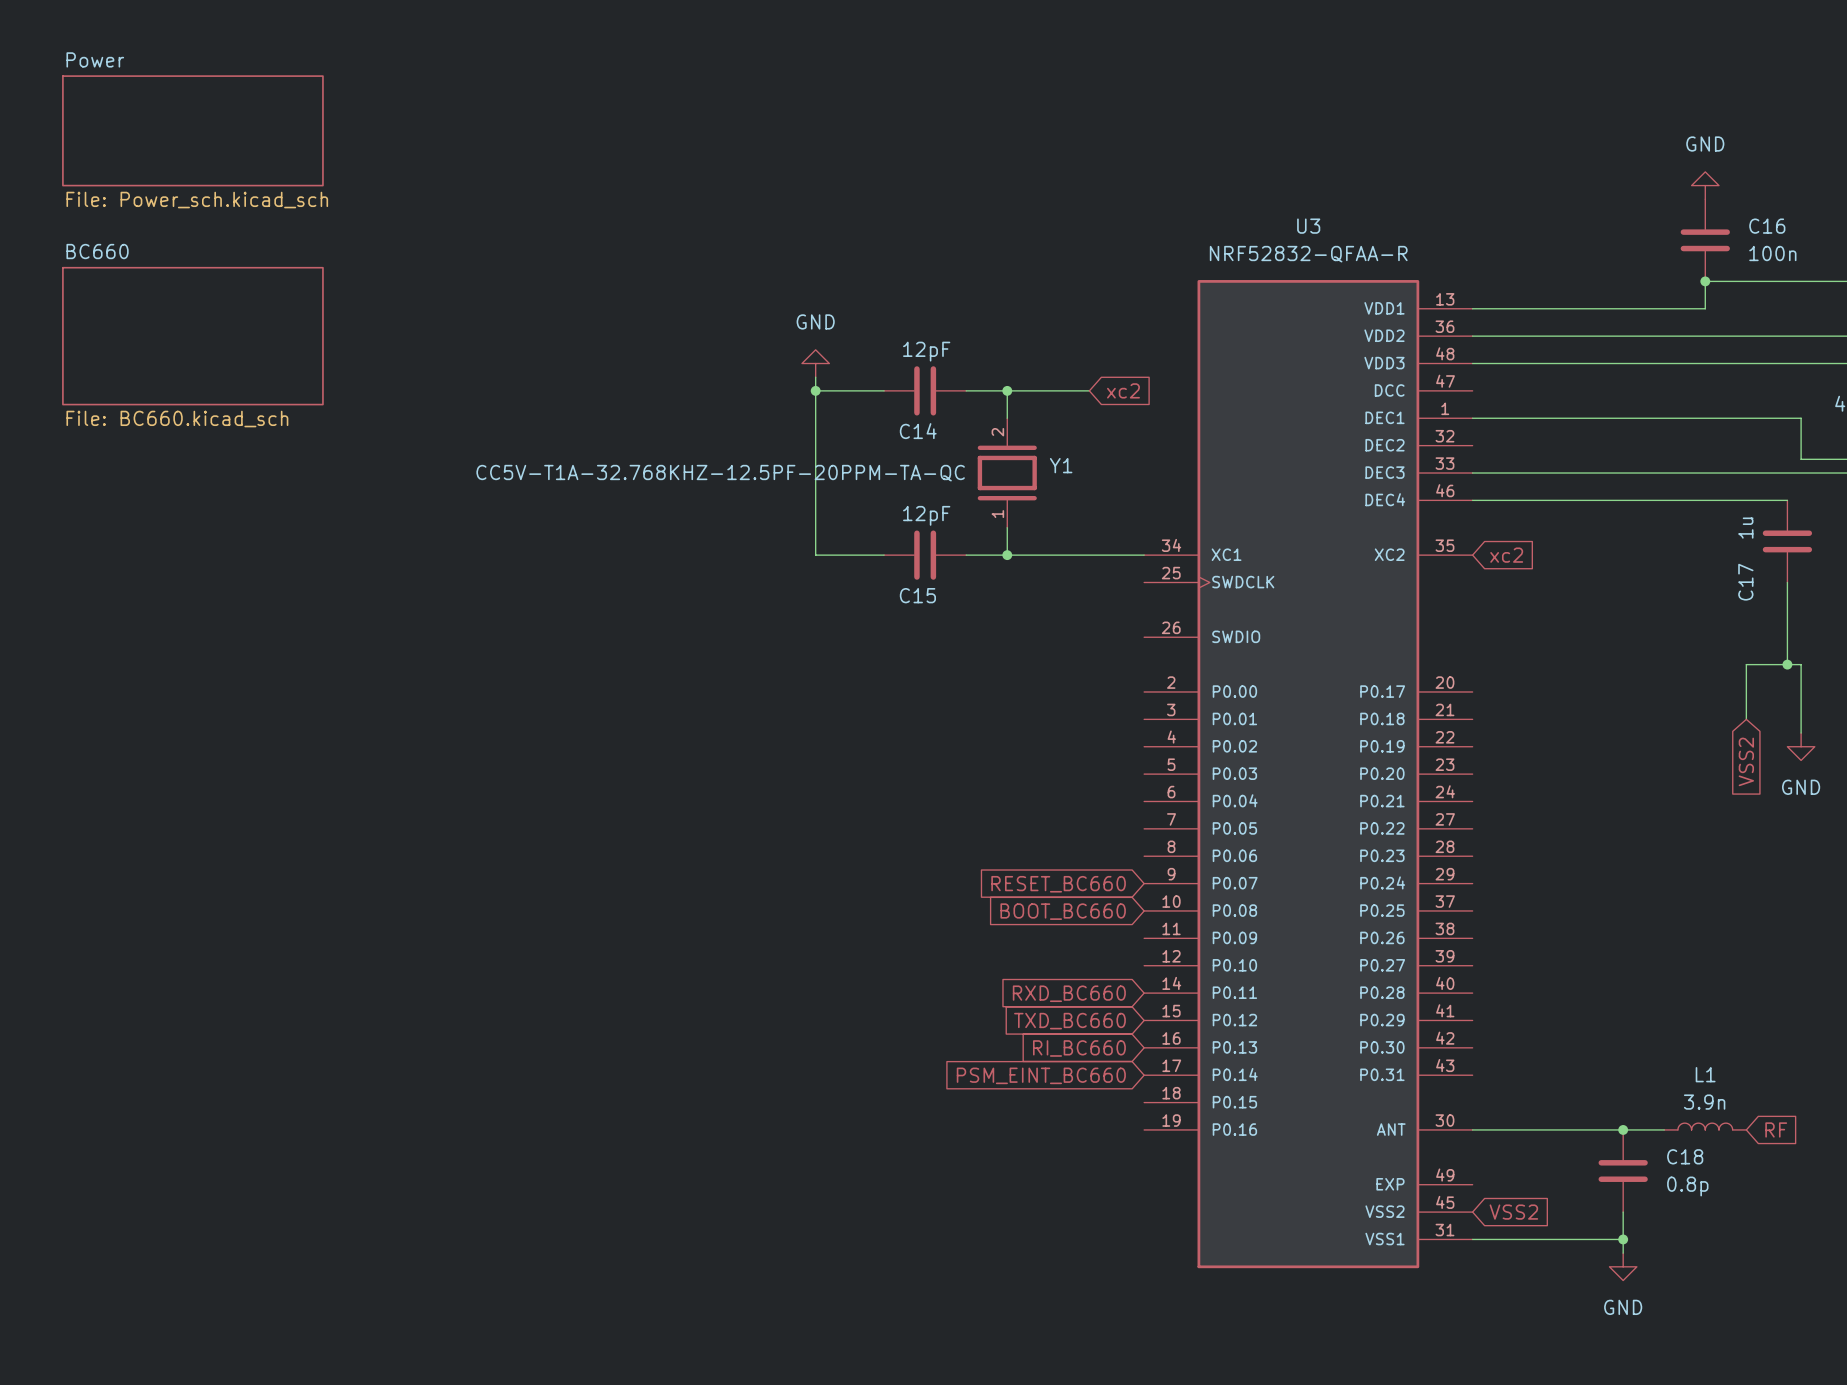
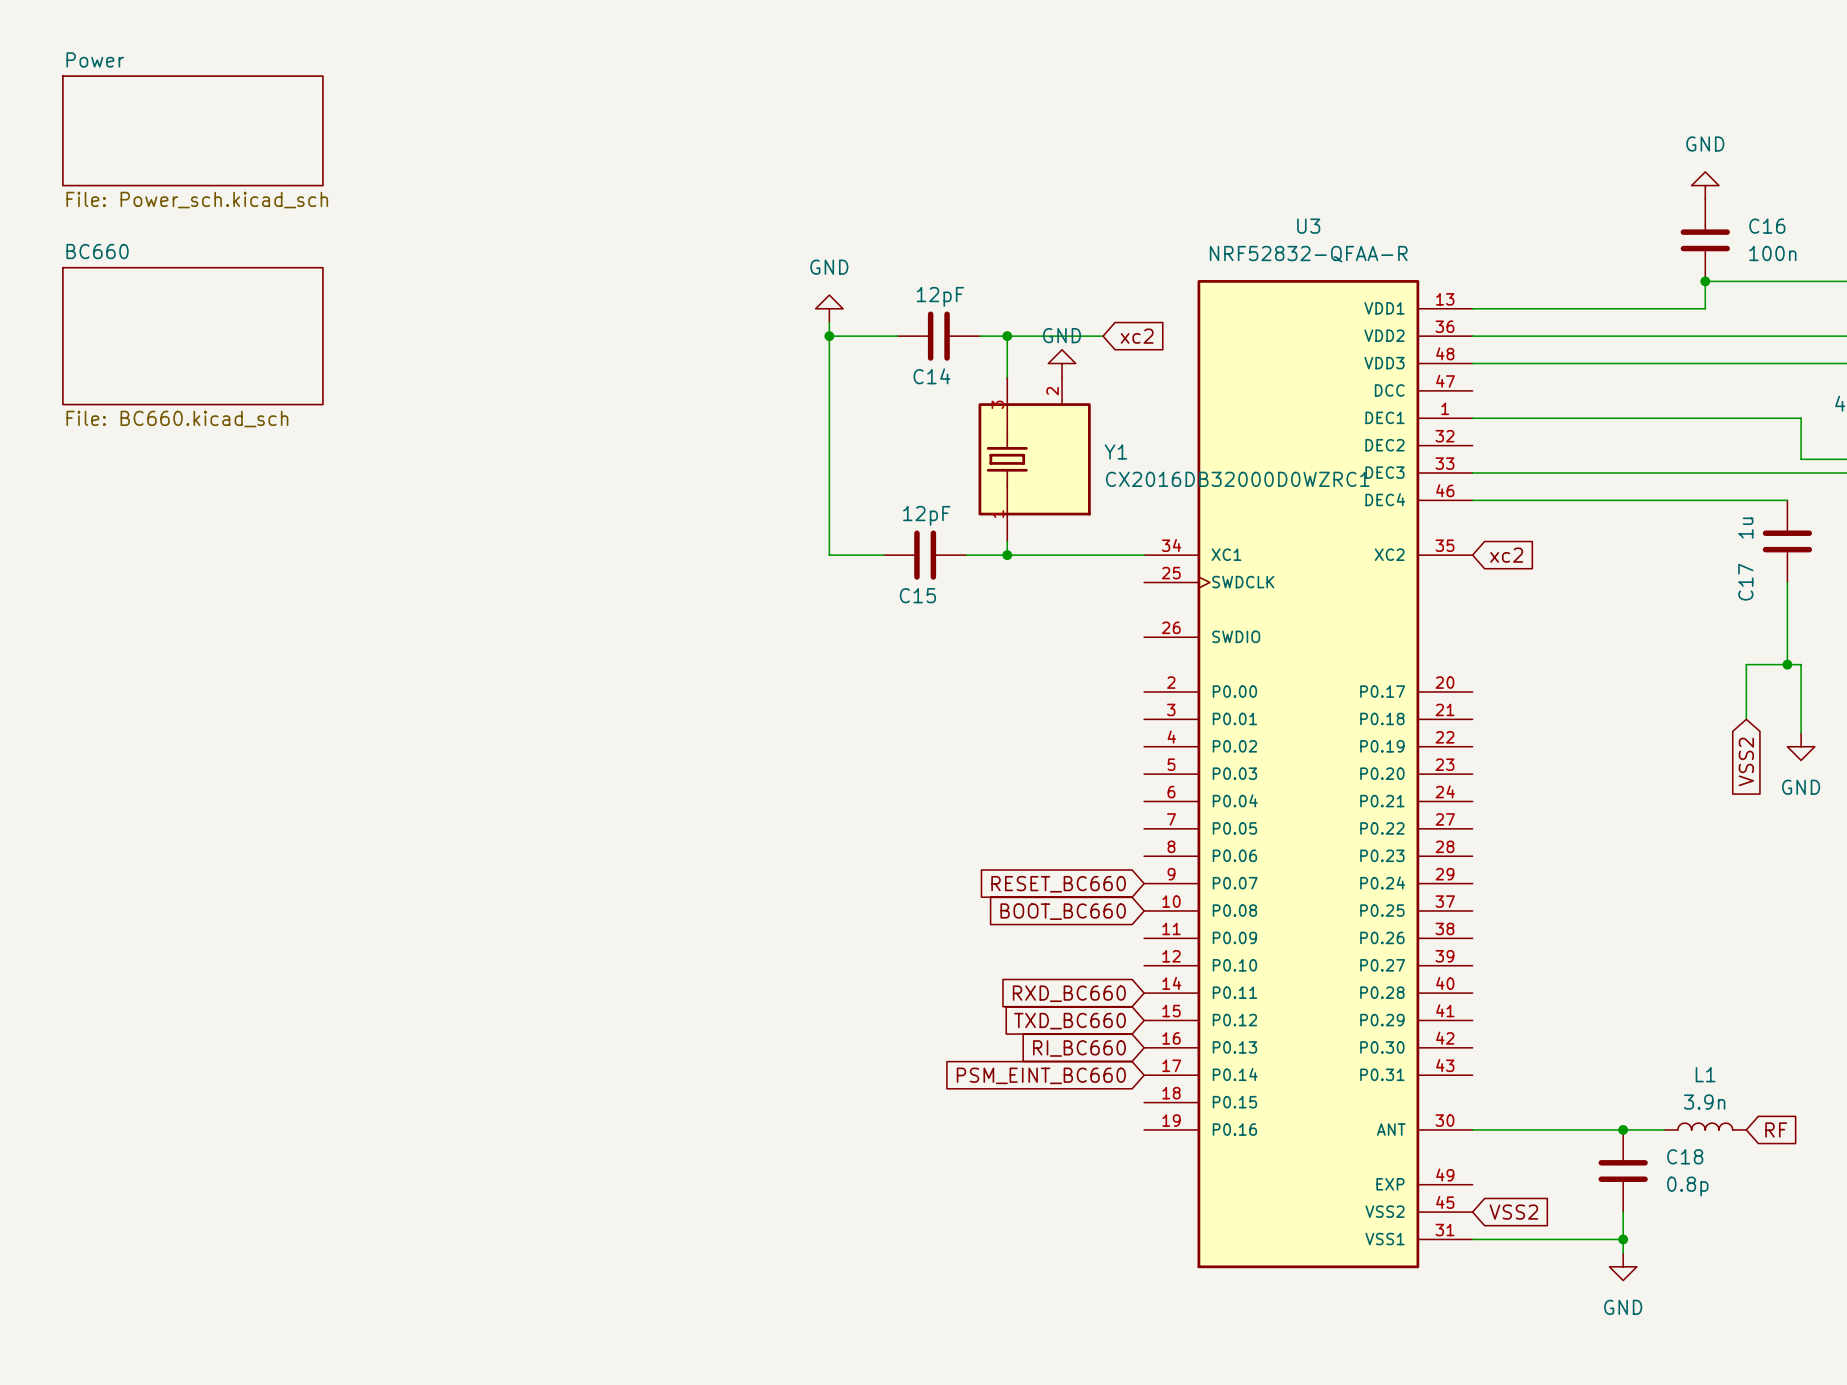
wire: none -> (1007, 336) (1007, 377)
power symbol position: GND (815, 363) -> GND (829, 308)
power symbol: none -> GND (1062, 363)
wire: (815, 377) (815, 555) (829, 555) -> (829, 322) (829, 555)
wire: (815, 390) (884, 390) -> (829, 336) (897, 336)
junction position: (815, 390) -> (829, 336)
C14 position: (925, 390) -> (938, 336)
wire: (966, 390) (1089, 390) -> (979, 336) (1103, 336)
junction position: (1007, 390) -> (1007, 336)
global label position: xc2 (1123, 390) -> xc2 (1137, 336)
Y1 symbol: [977, 418, 1037, 528] -> [978, 377, 1091, 542]
Y1 name position: Y1 (1061, 465) -> Y1 (1115, 451)
Y1 value: CC5V-T1A-32.768KHZ-12.5PF-20PPM-TA-QC (720, 473) -> CX2016DB32000D0WZRC1 (1237, 479)

